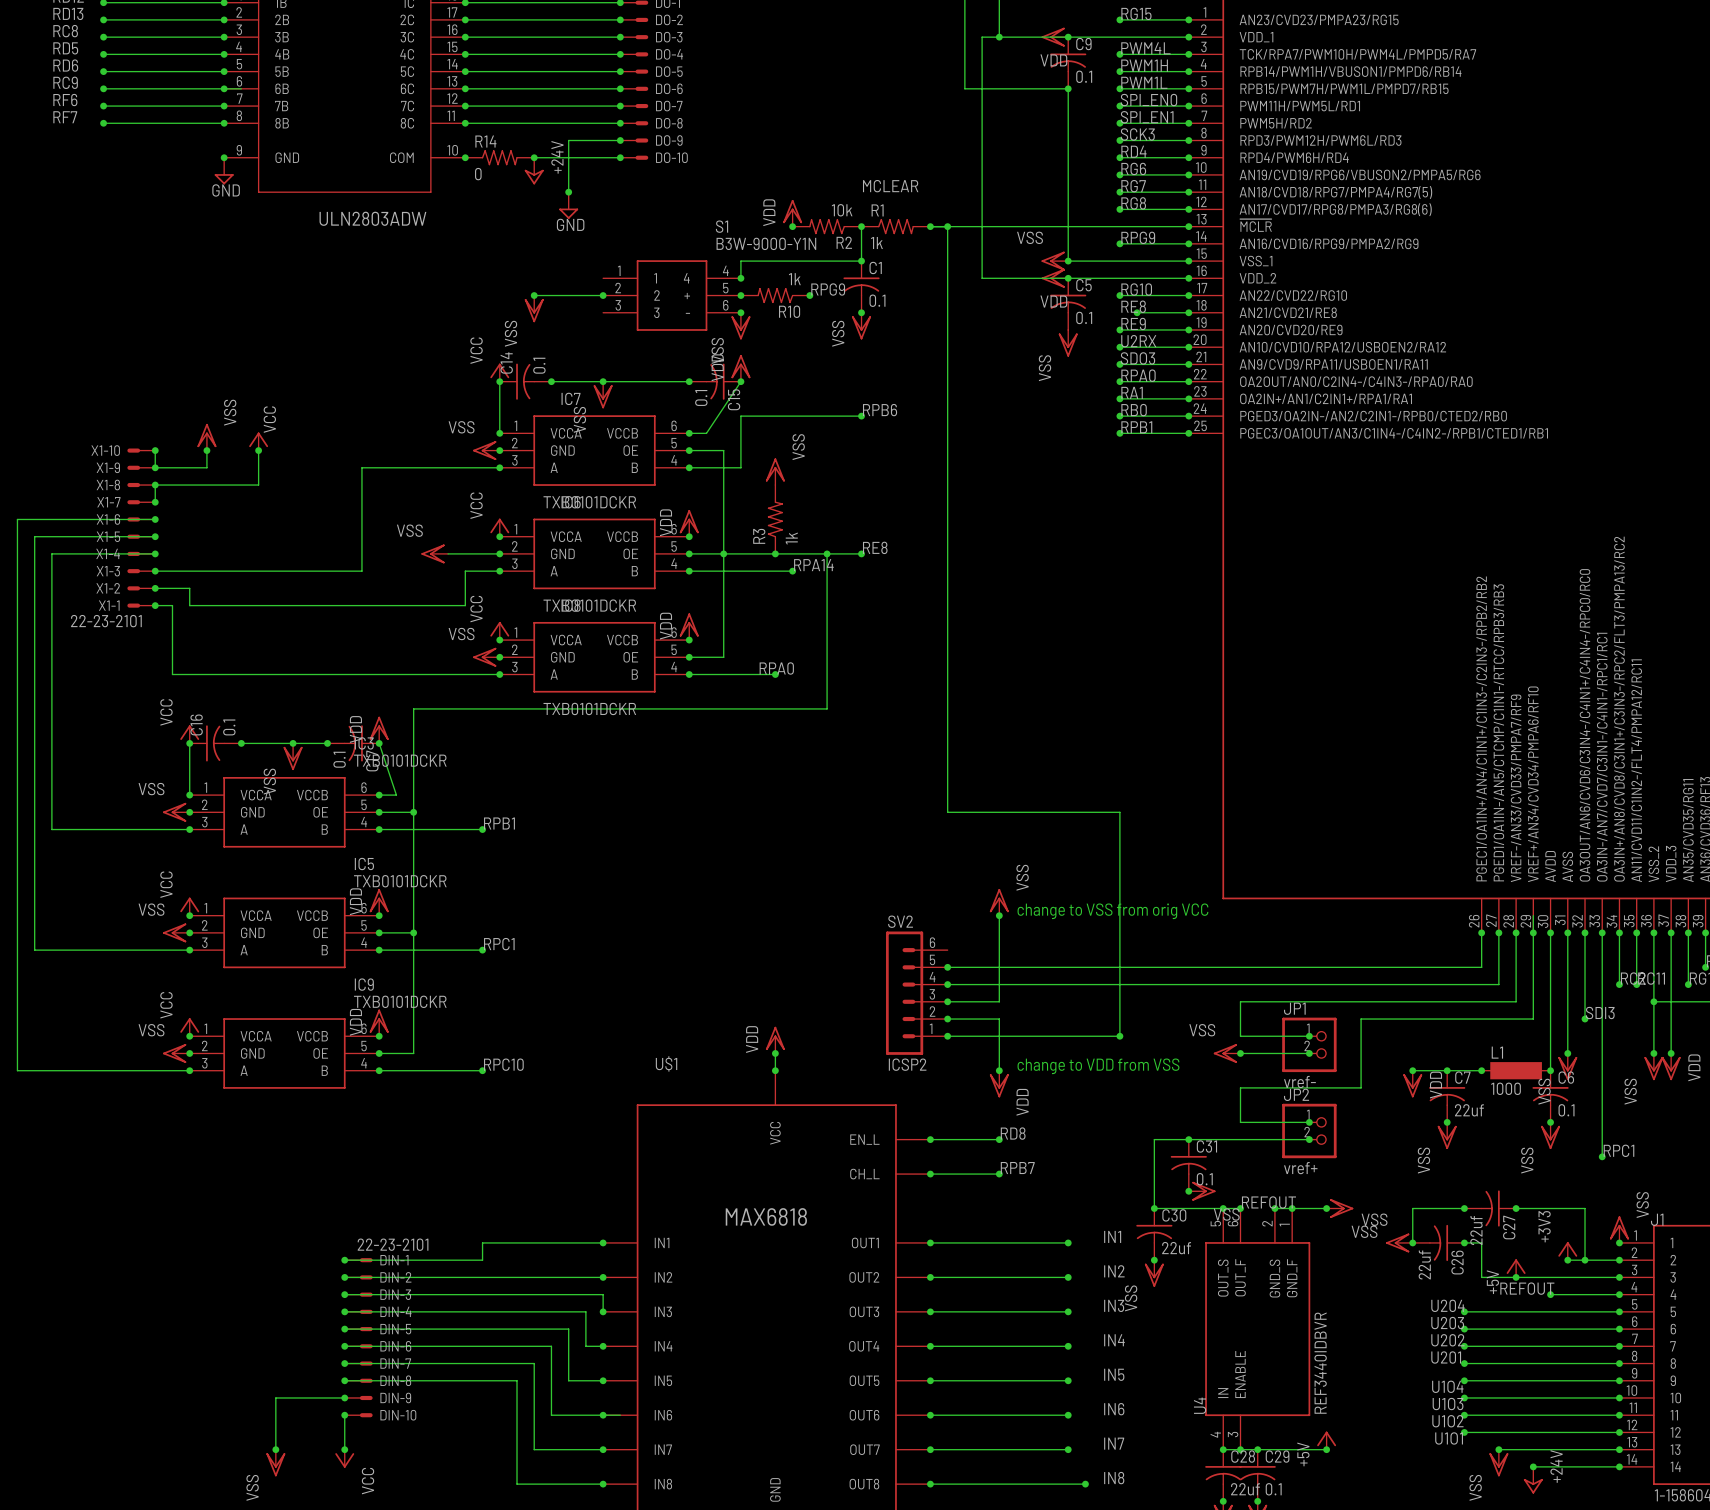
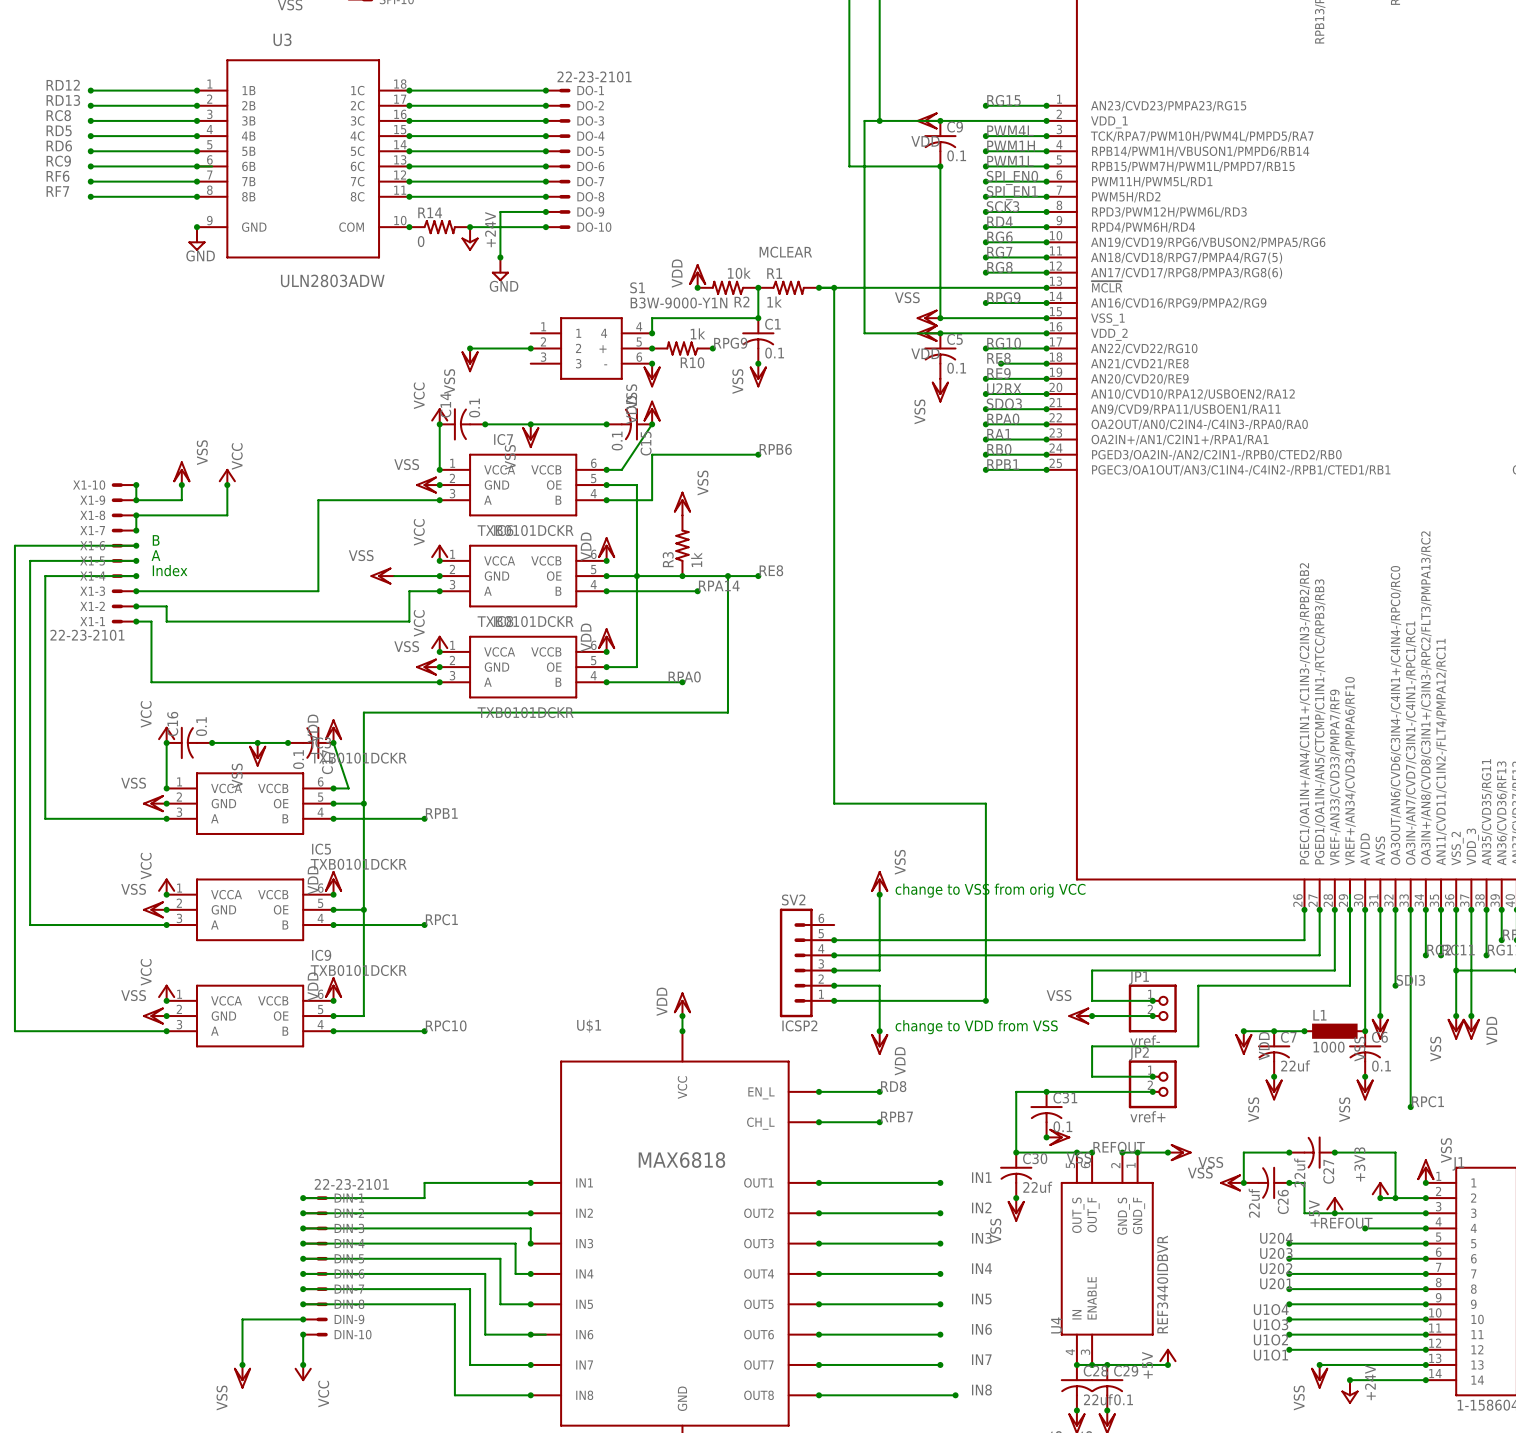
text: none -> B (156, 540)
text: none -> A (155, 555)
text: none -> Index (170, 570)

